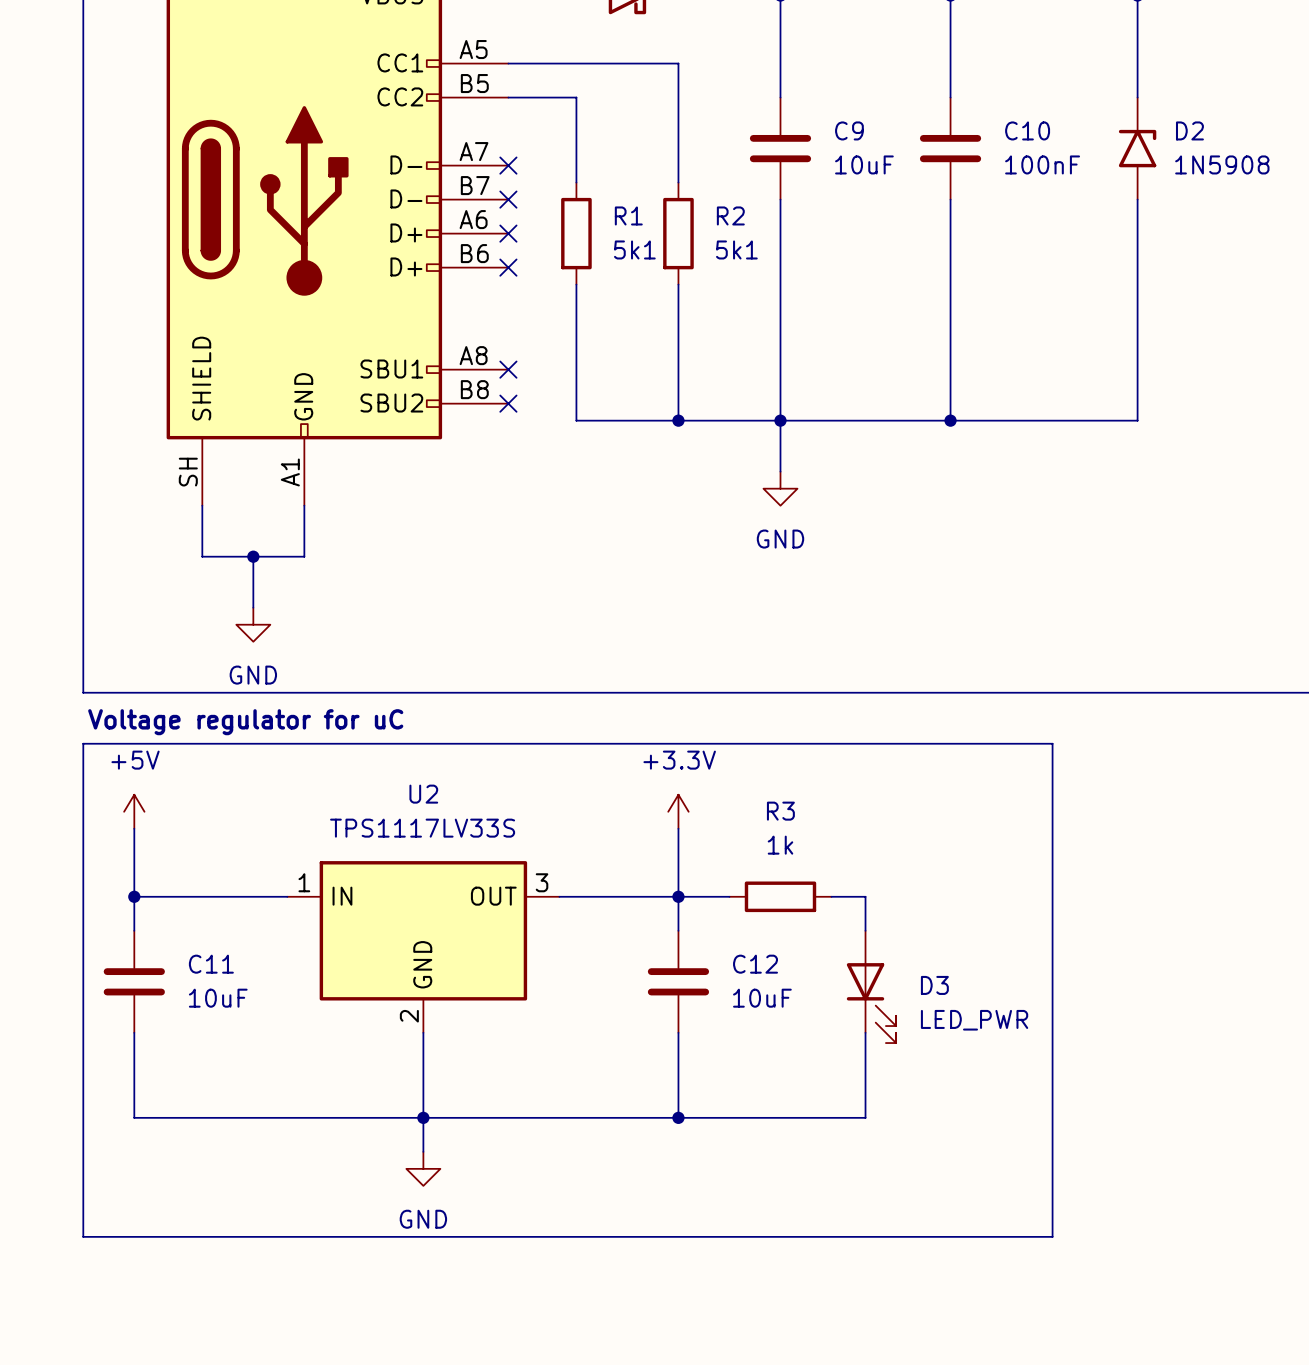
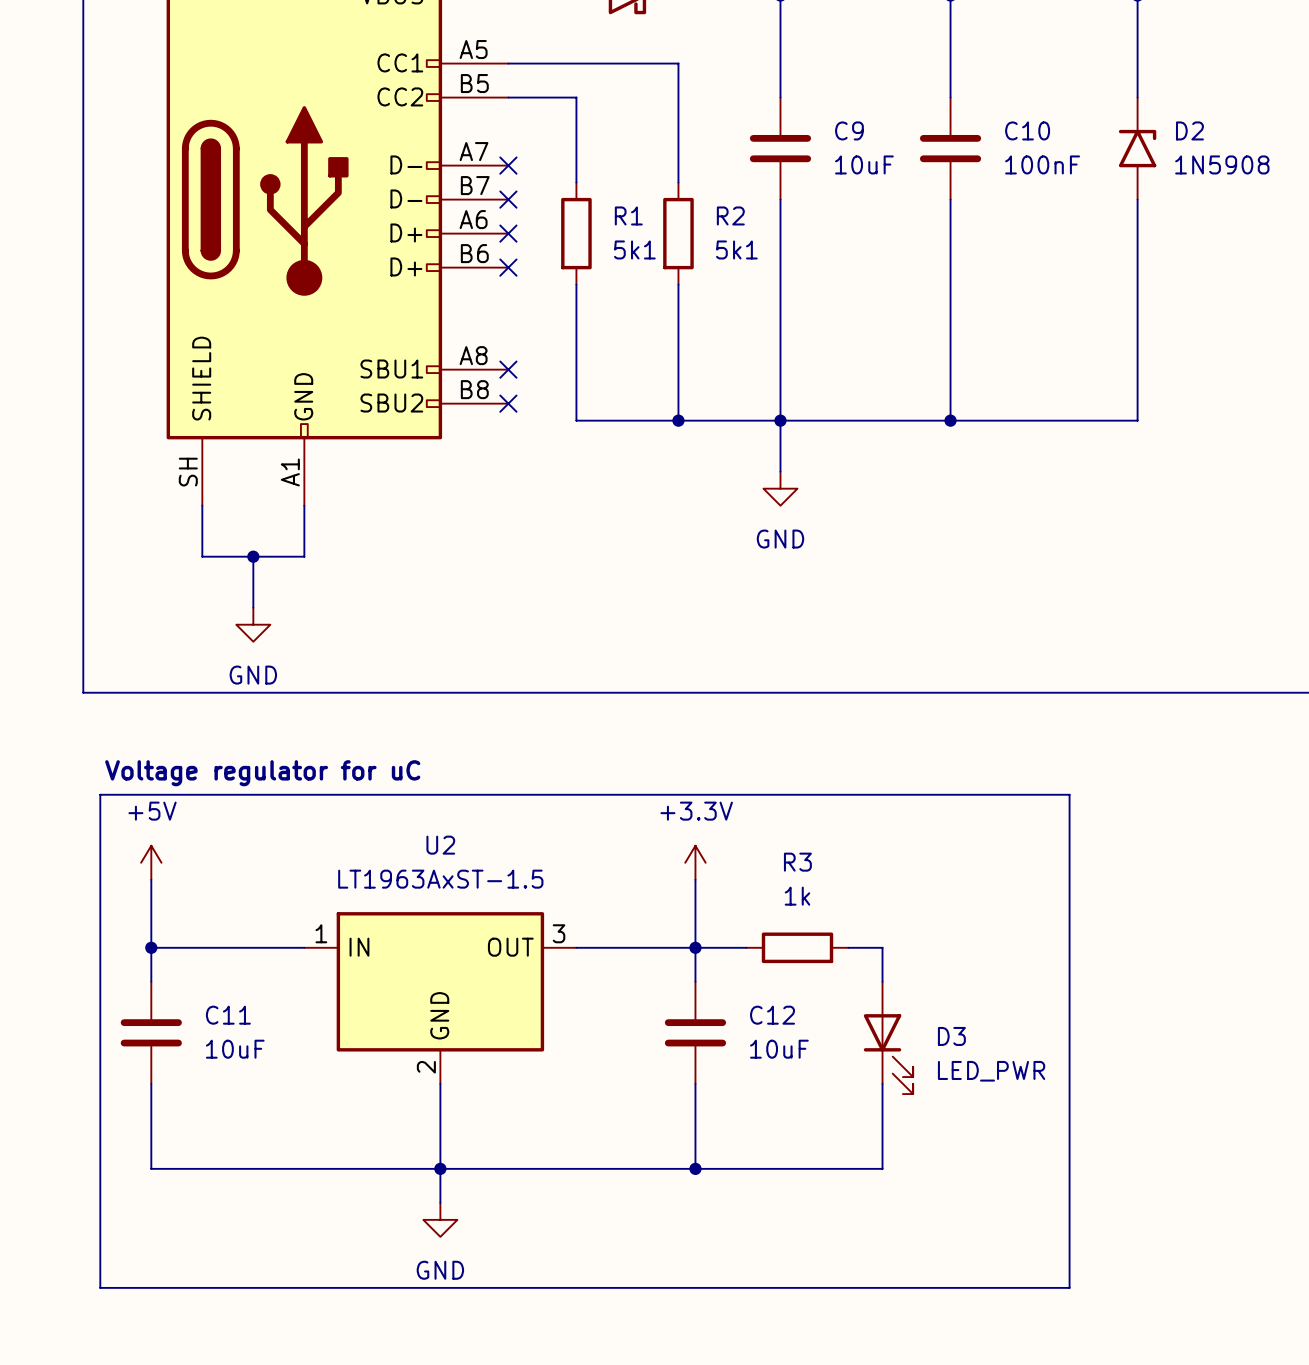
text position: Voltage regulator for uC (245, 722) -> Voltage regulator for uC (262, 773)
line: (83, 743) (1052, 743) (1052, 1236) (83, 1236) (83, 743) -> (100, 794) (1069, 794) (1069, 1287) (100, 1287) (100, 794)
power symbol position: +5V (134, 811) -> +5V (151, 862)
power symbol position: +3.3V (678, 811) -> +3.3V (695, 862)
wire: (134, 828) (134, 930) -> (151, 879) (151, 981)
U2 value: TPS1117LV33S (422, 828) -> LT1963AxST-1.5 (440, 879)
wire: (678, 828) (678, 930) -> (695, 879) (695, 981)
wire: (134, 896) (287, 896) -> (151, 947) (304, 947)
junction position: (134, 896) -> (151, 947)
wire: (559, 896) (729, 896) -> (576, 947) (746, 947)
junction position: (678, 896) -> (695, 947)
R3 position: (780, 896) -> (797, 947)
wire: (831, 896) (865, 896) (865, 930) -> (848, 947) (882, 947) (882, 981)
U2 position: (423, 946) -> (440, 997)
C11 position: (134, 981) -> (151, 1032)
C12 position: (678, 981) -> (695, 1032)
D3 position: (871, 986) -> (888, 1037)
wire: (134, 1032) (134, 1117) (865, 1117) (865, 1032) -> (151, 1083) (151, 1168) (882, 1168) (882, 1083)
wire: (423, 1032) (423, 1151) -> (440, 1083) (440, 1202)
wire: (678, 1032) (678, 1117) -> (695, 1083) (695, 1168)
junction position: (423, 1117) -> (440, 1168)
junction position: (678, 1117) -> (695, 1168)
power symbol position: GND (423, 1168) -> GND (440, 1219)

